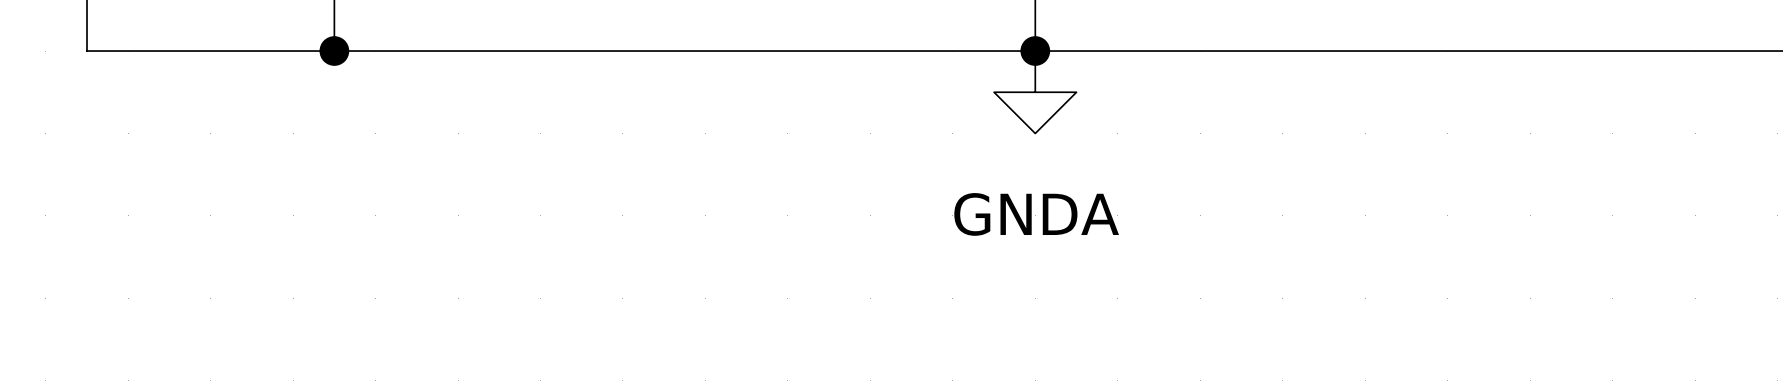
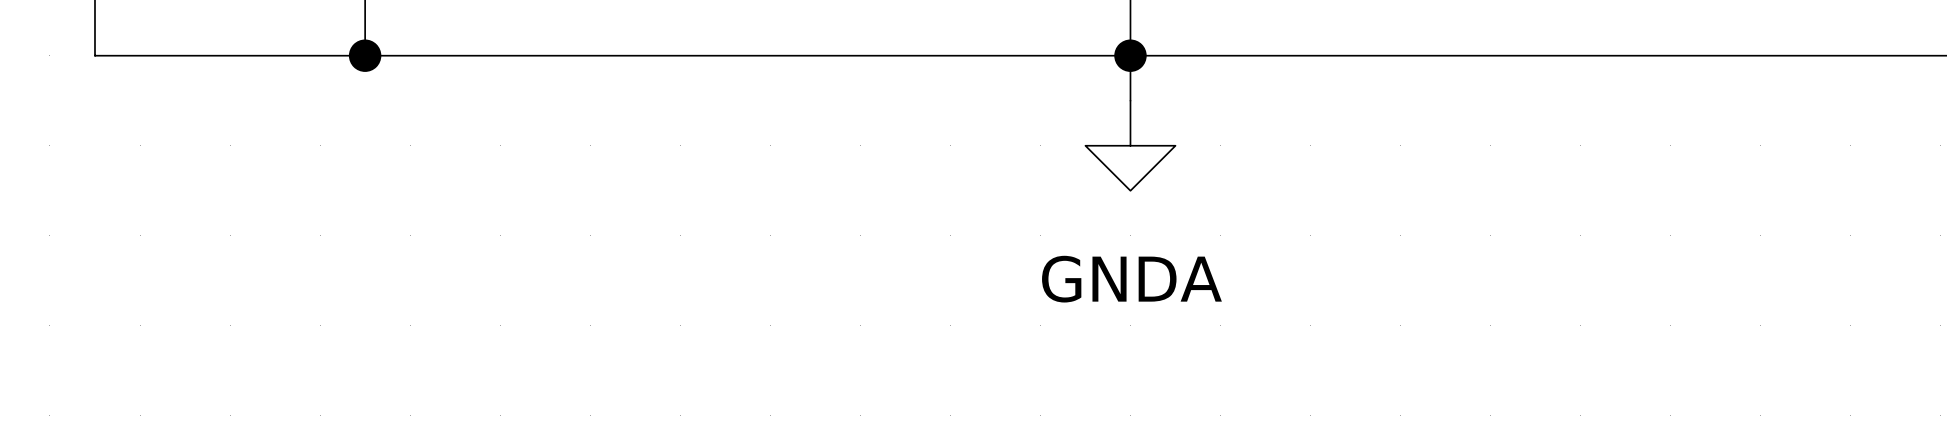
power symbol position: GNDA (1035, 92) -> GNDA (1130, 145)

